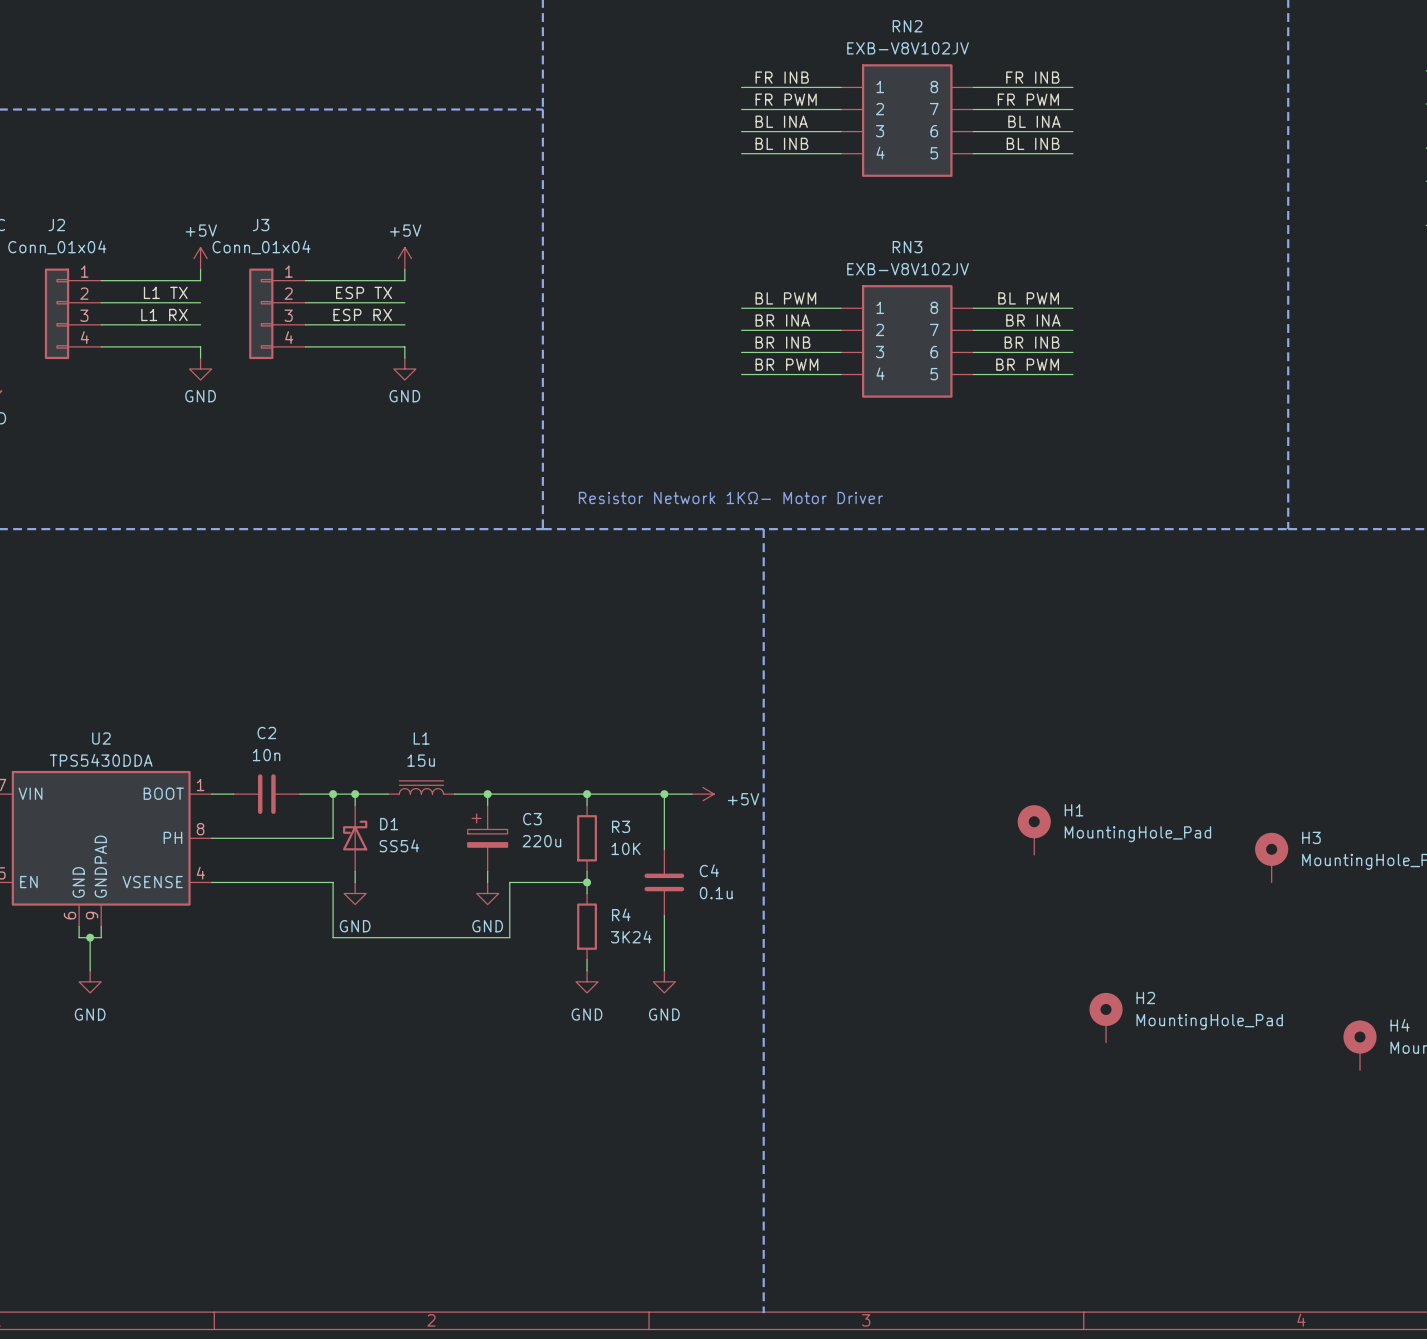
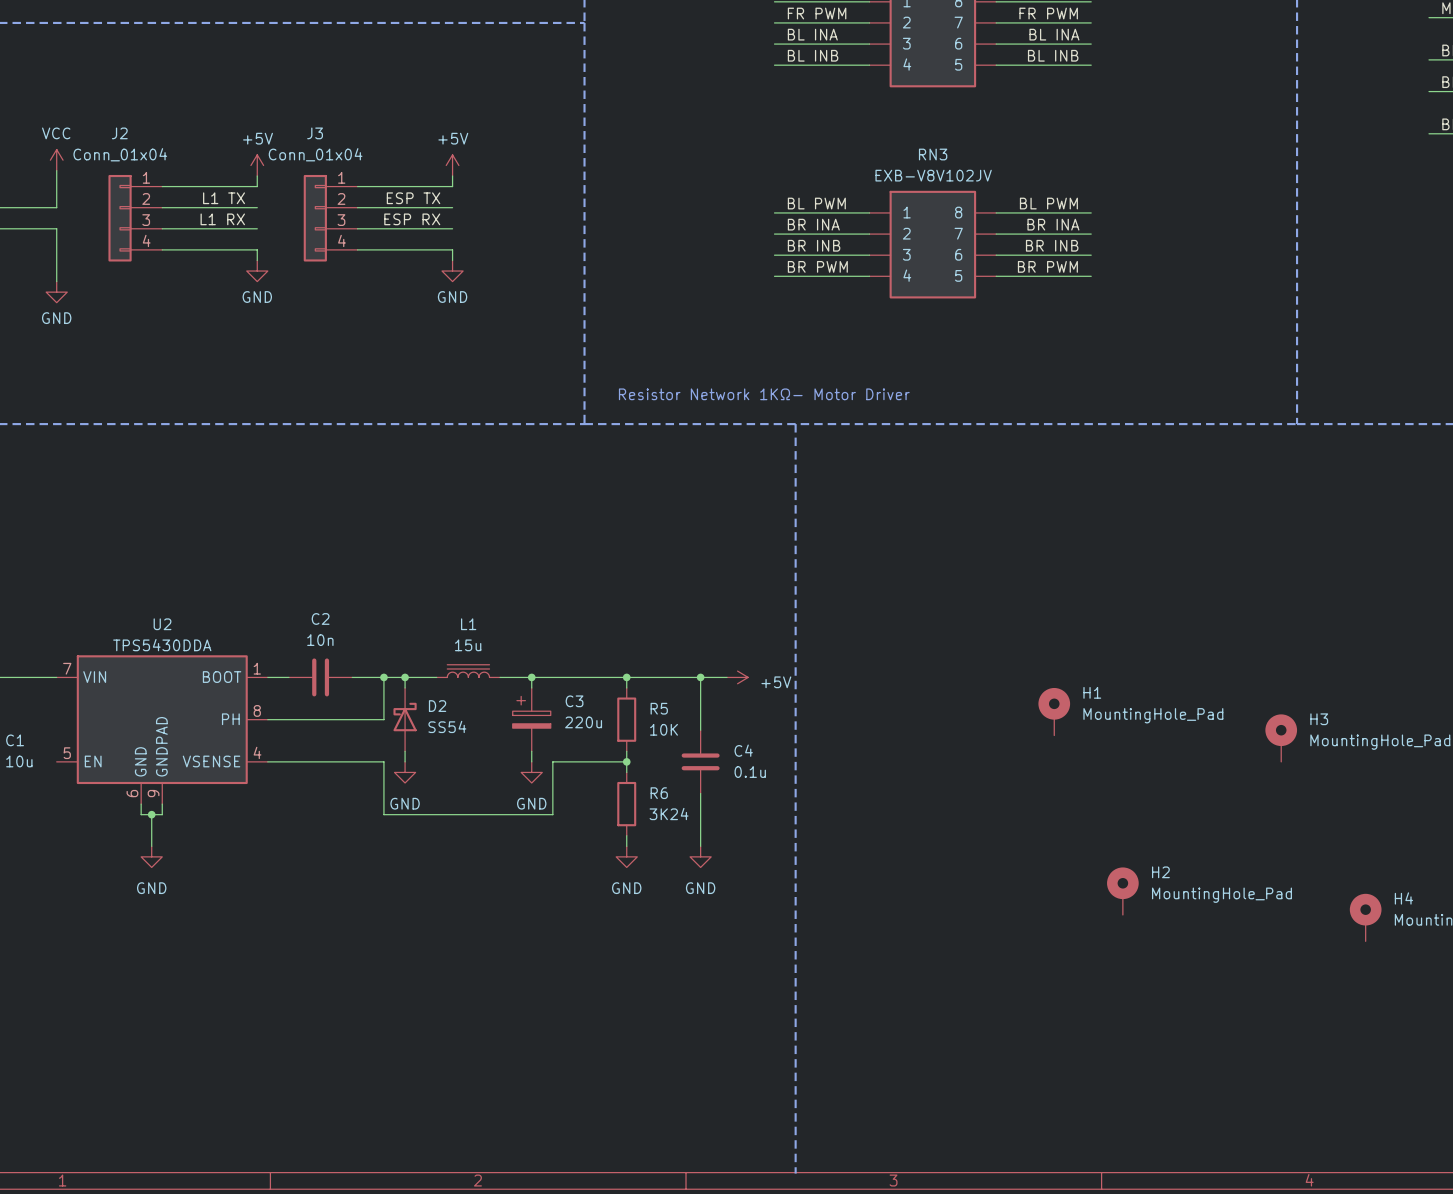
D1 name: D1 (389, 824) -> D2 (437, 706)
R3 name: R3 (621, 826) -> R5 (659, 708)
R4 name: R4 (621, 914) -> R6 (659, 793)

